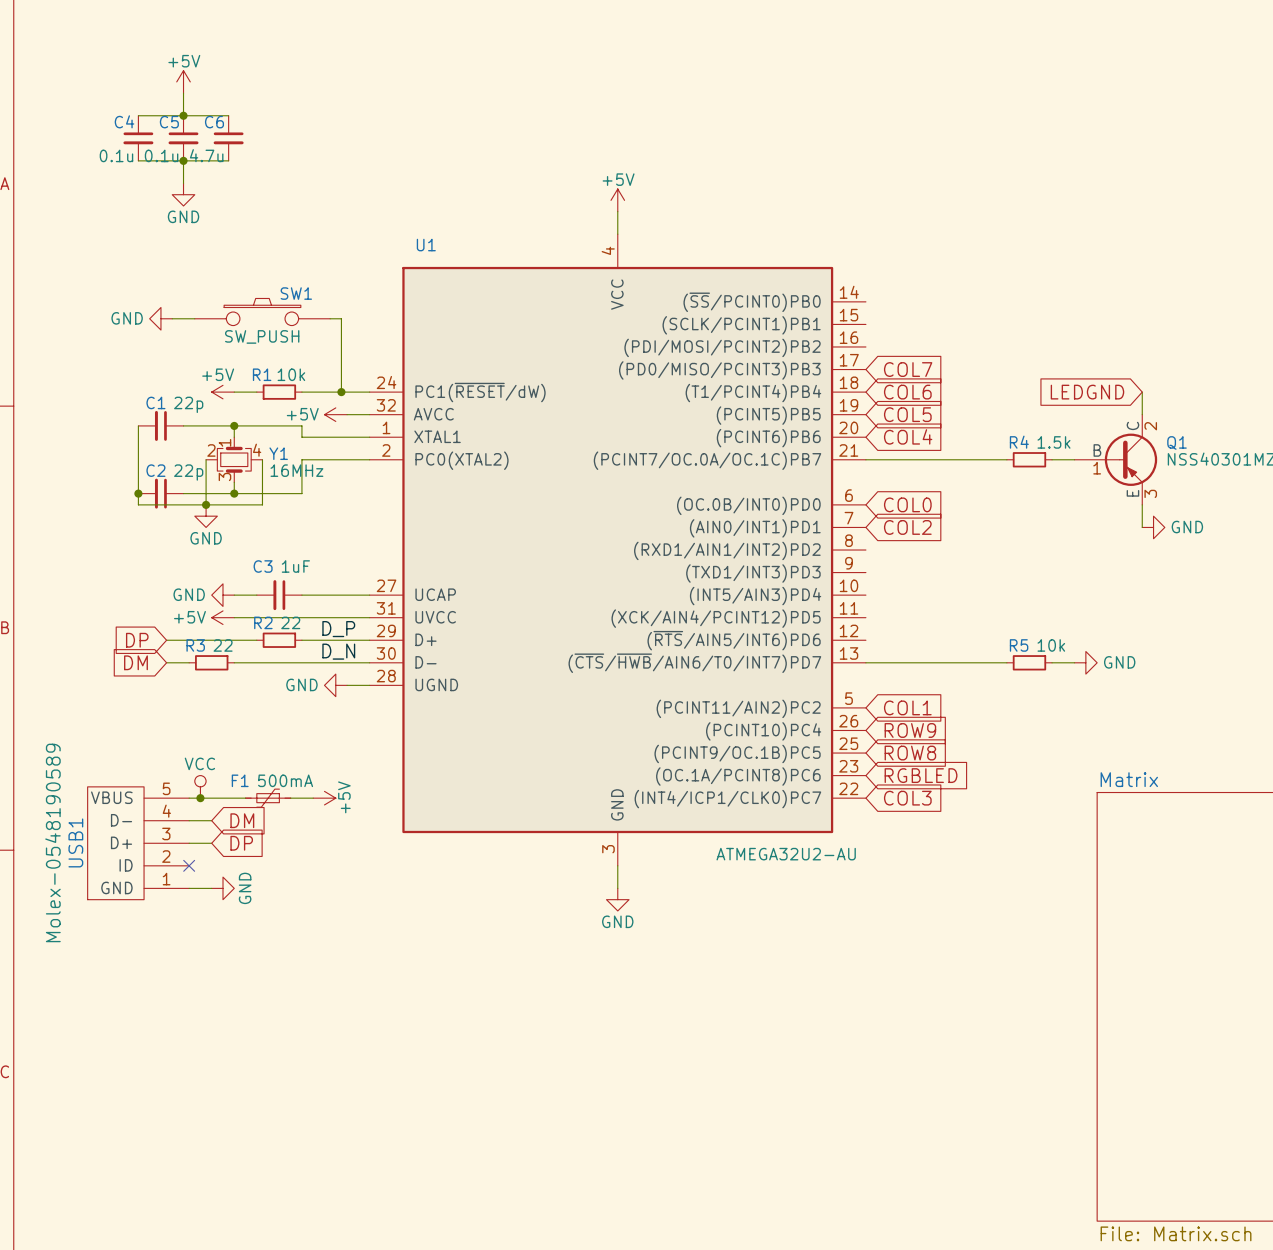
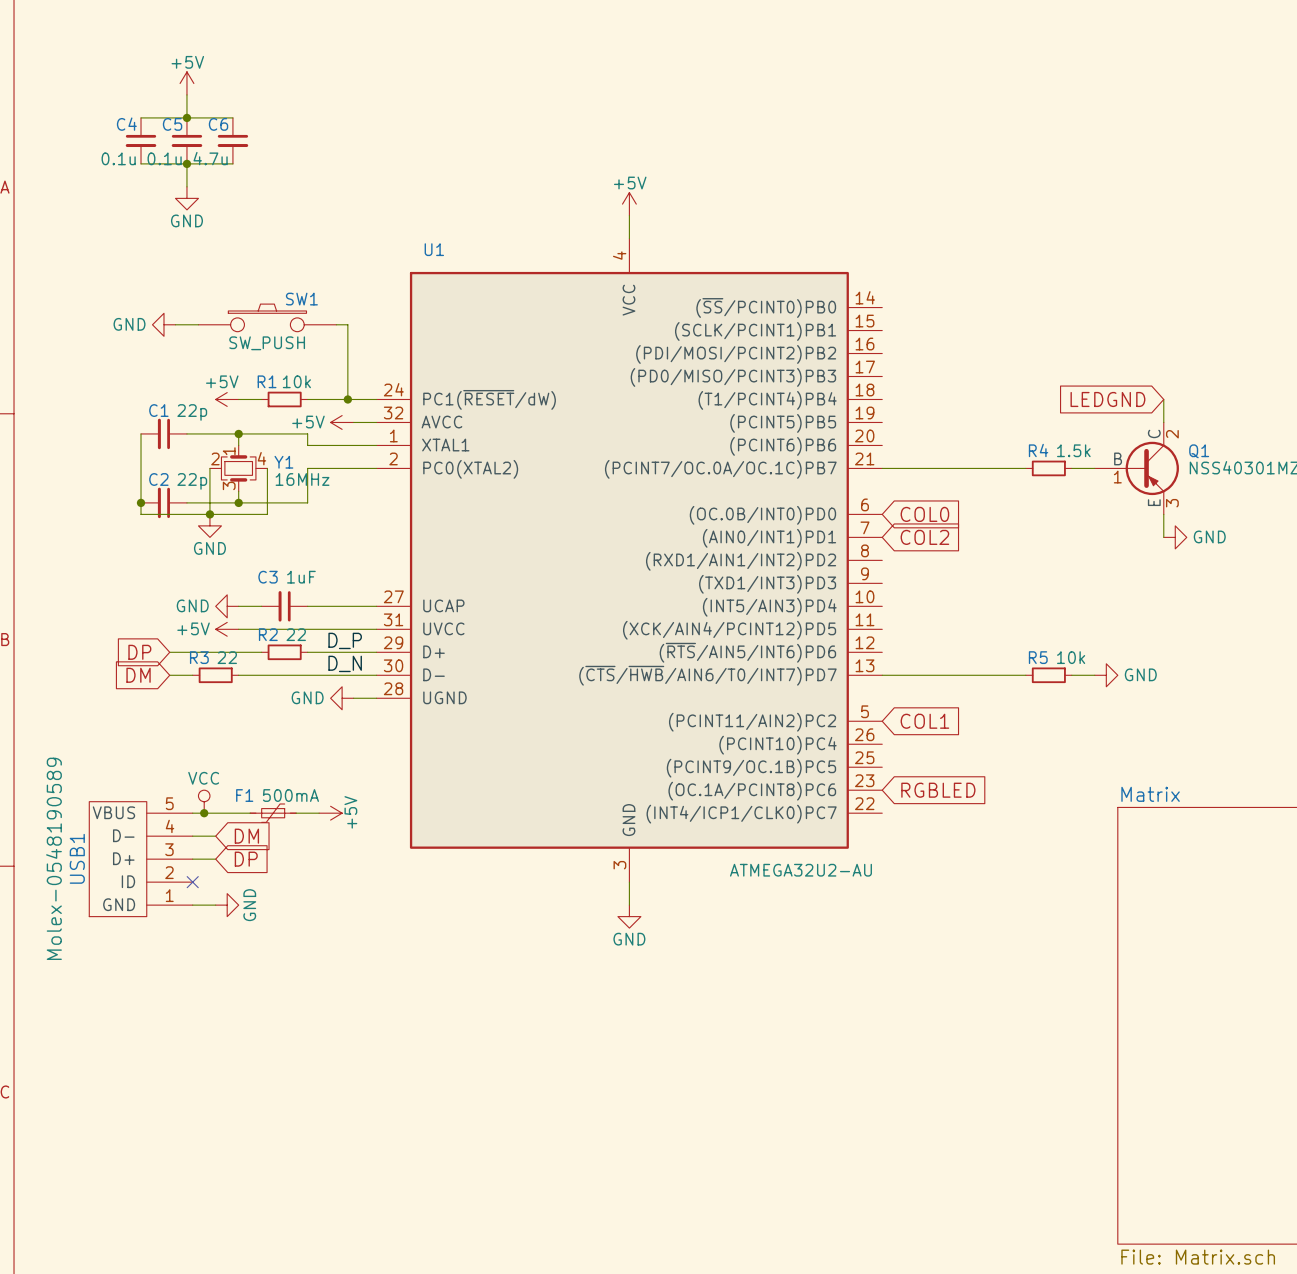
global label: COL7 (908, 369) -> none
global label: COL6 (907, 392) -> none
global label: COL5 (907, 414) -> none
global label: COL4 (908, 436) -> none
global label: ROW9 (910, 730) -> none
global label: ROW8 (910, 753) -> none
global label: COL3 (907, 798) -> none

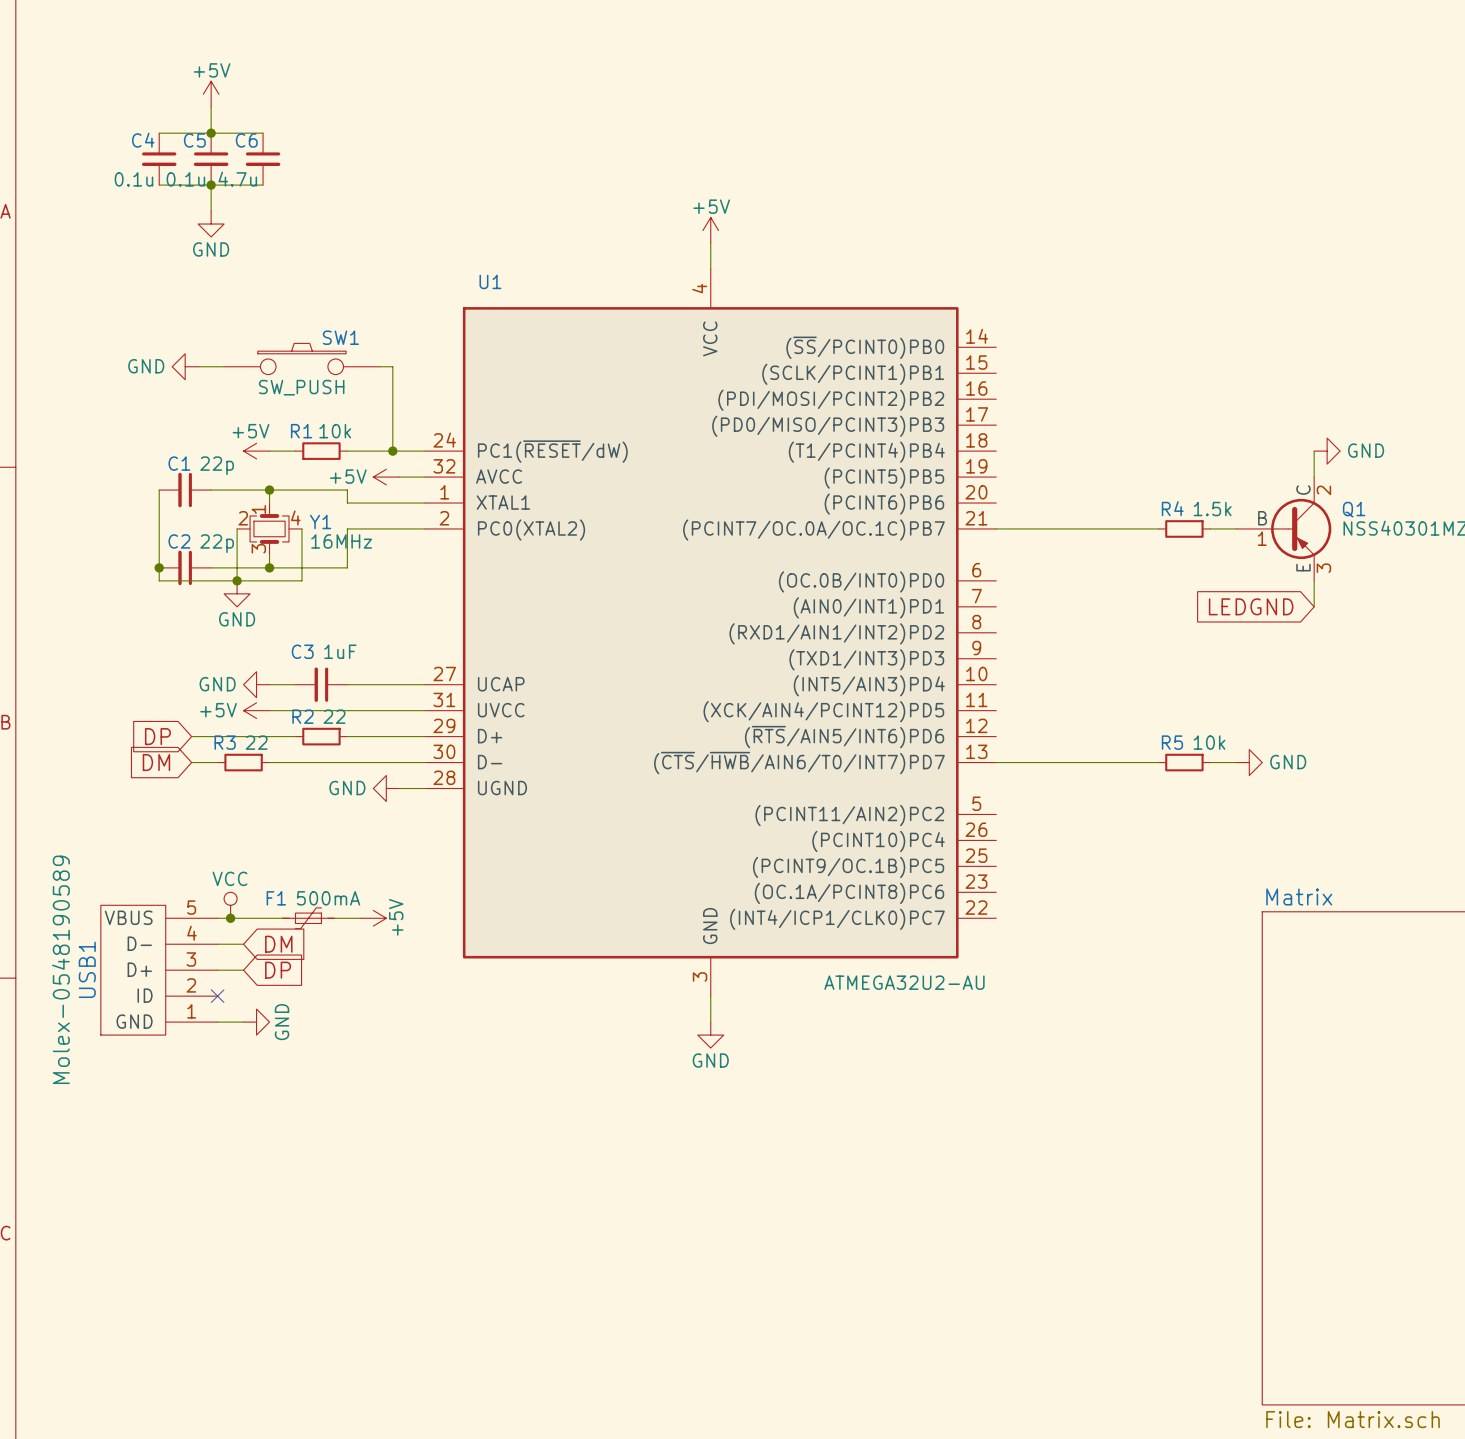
global label position: LEDGND (1107, 399) -> LEDGND (1251, 606)
global label: COL0 (924, 514) -> none
global label: COL2 (924, 537) -> none
power symbol position: GND (1175, 537) -> GND (1327, 451)
label: D_P (345, 640) -> none
label: D_N (345, 663) -> none
global label: COL1 (924, 721) -> none
global label: RGBLED (938, 790) -> none

